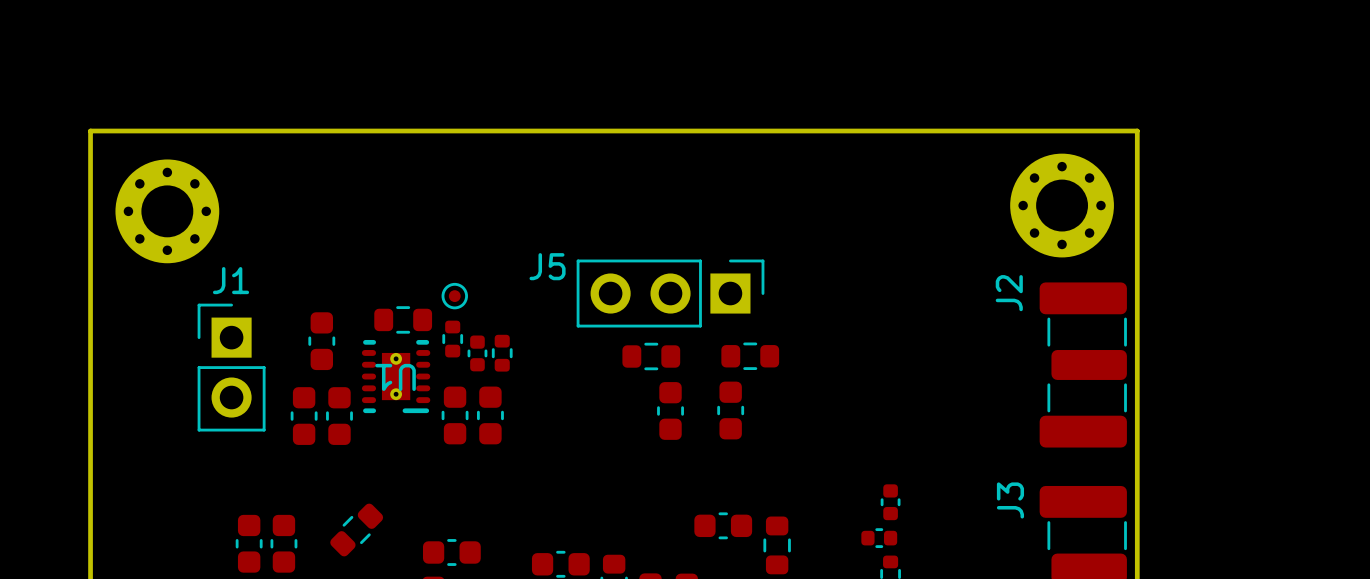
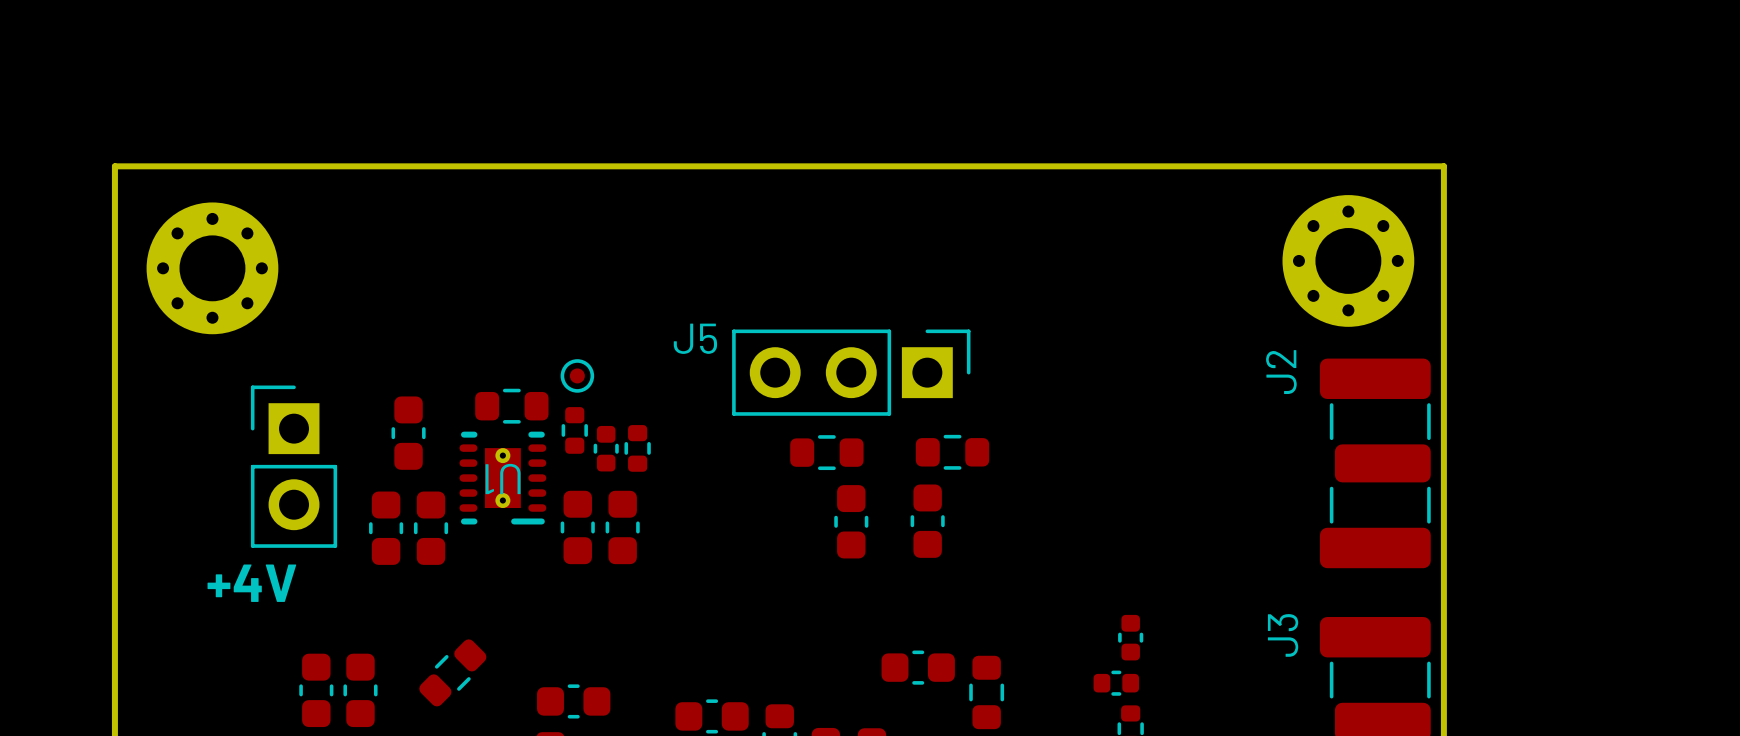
J1 name: J1 (231, 280) -> none
text: none -> +4V (251, 583)

